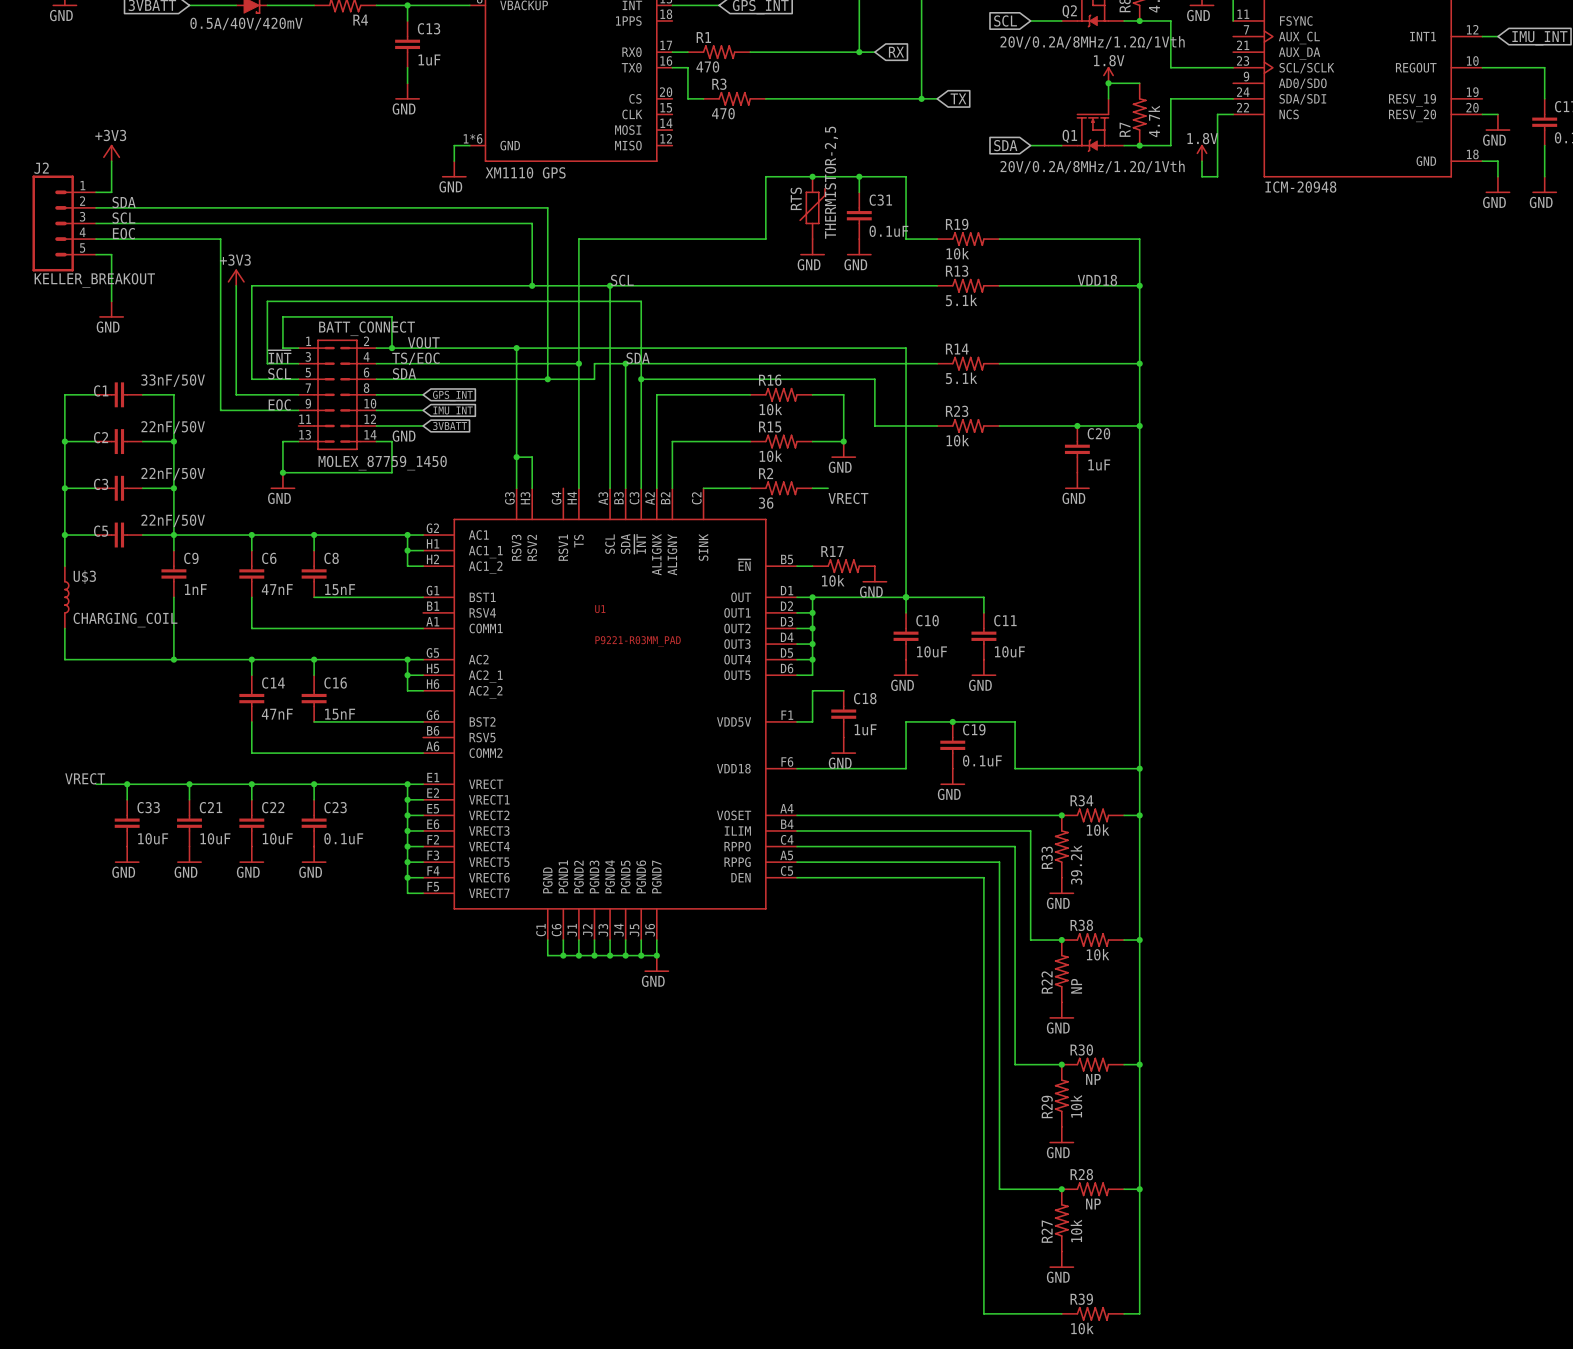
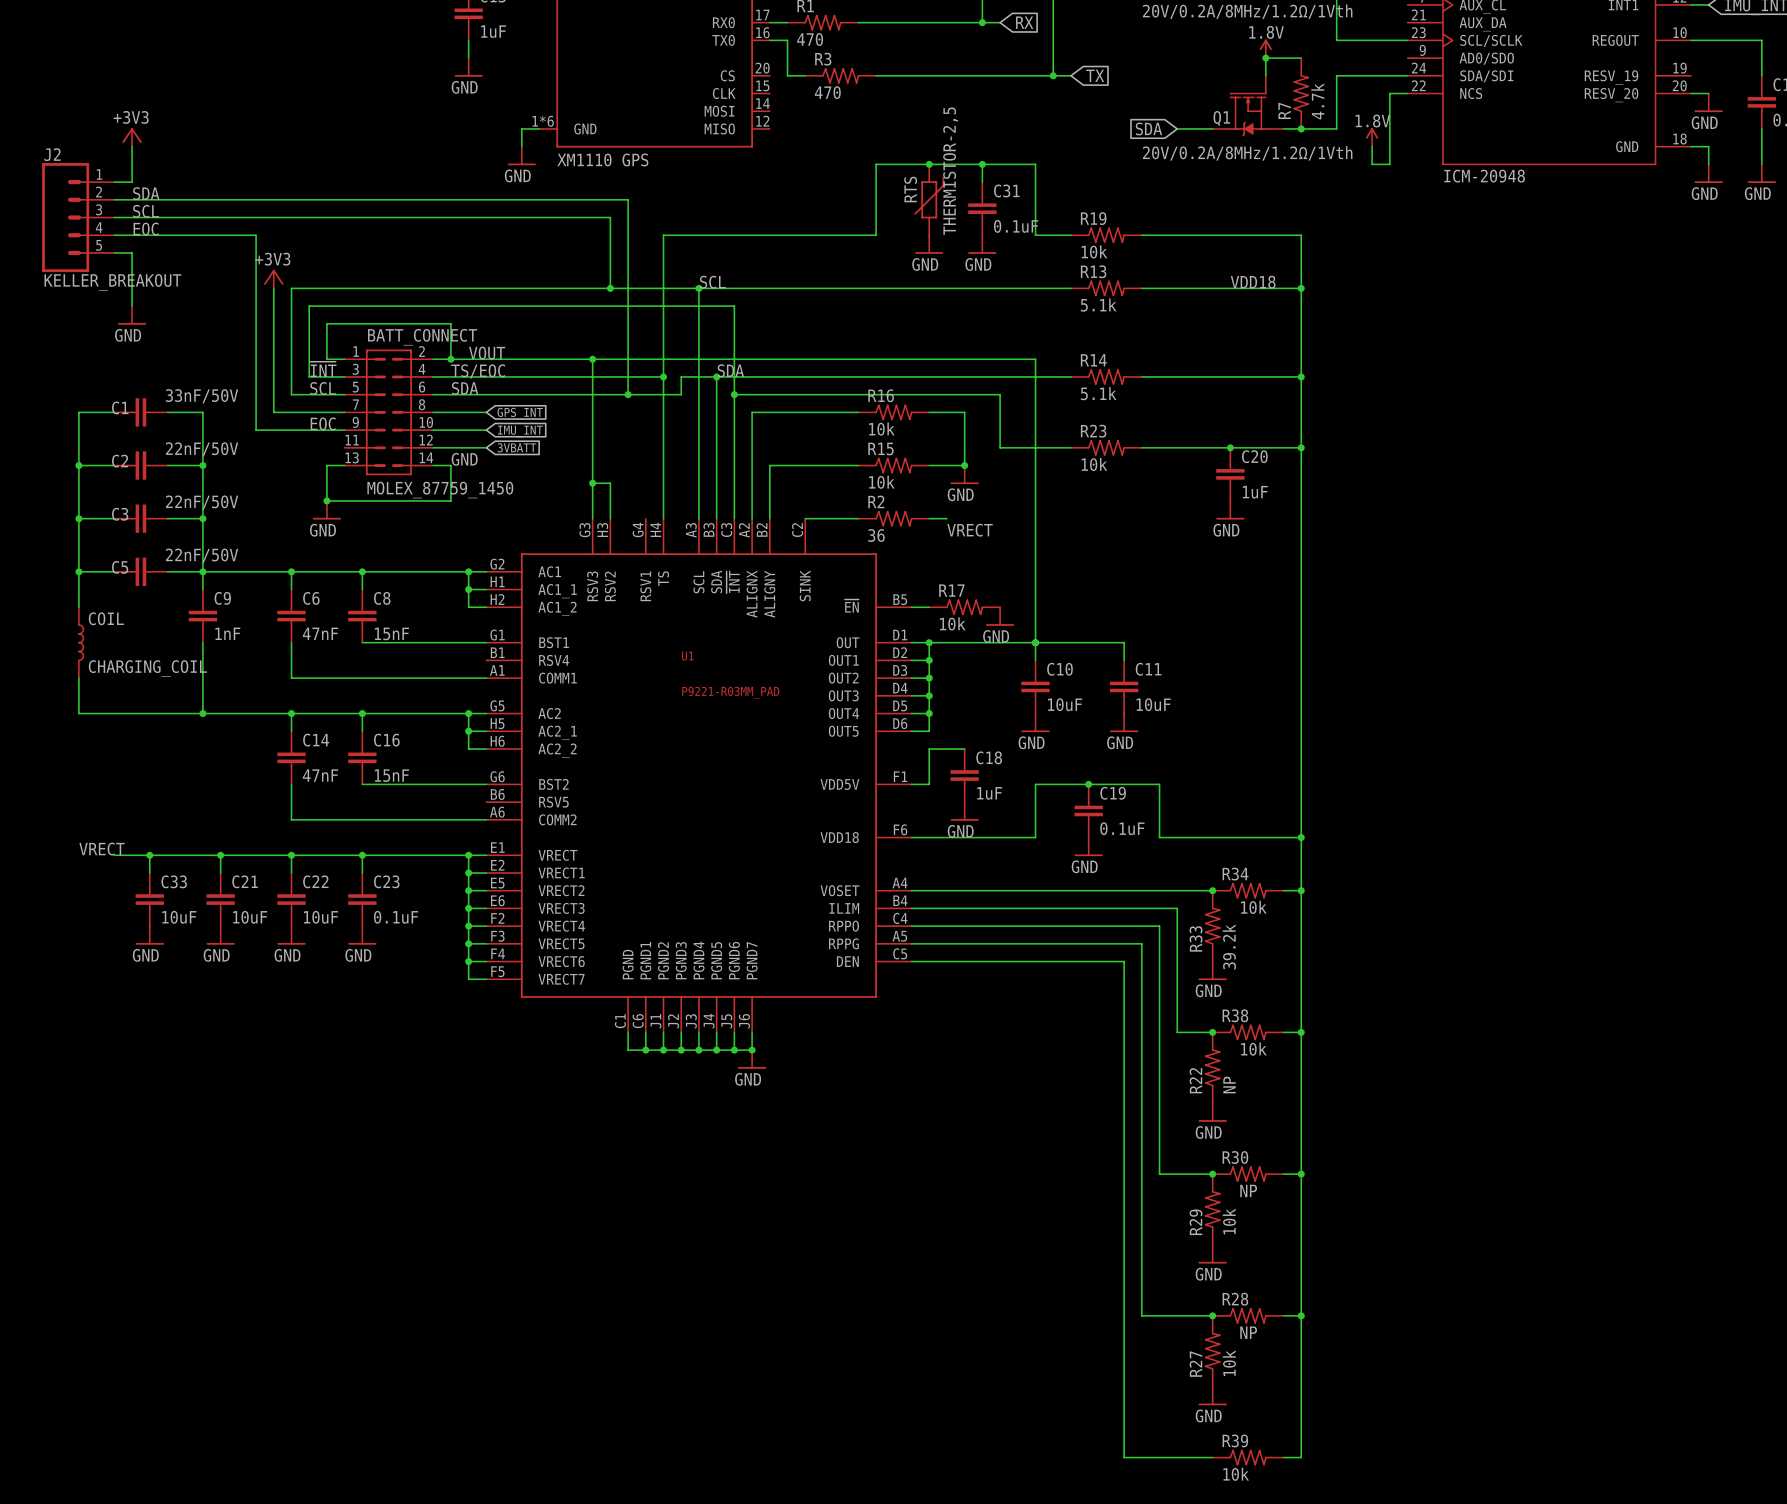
U$3 name: U$3 (84, 577) -> COIL (106, 618)

